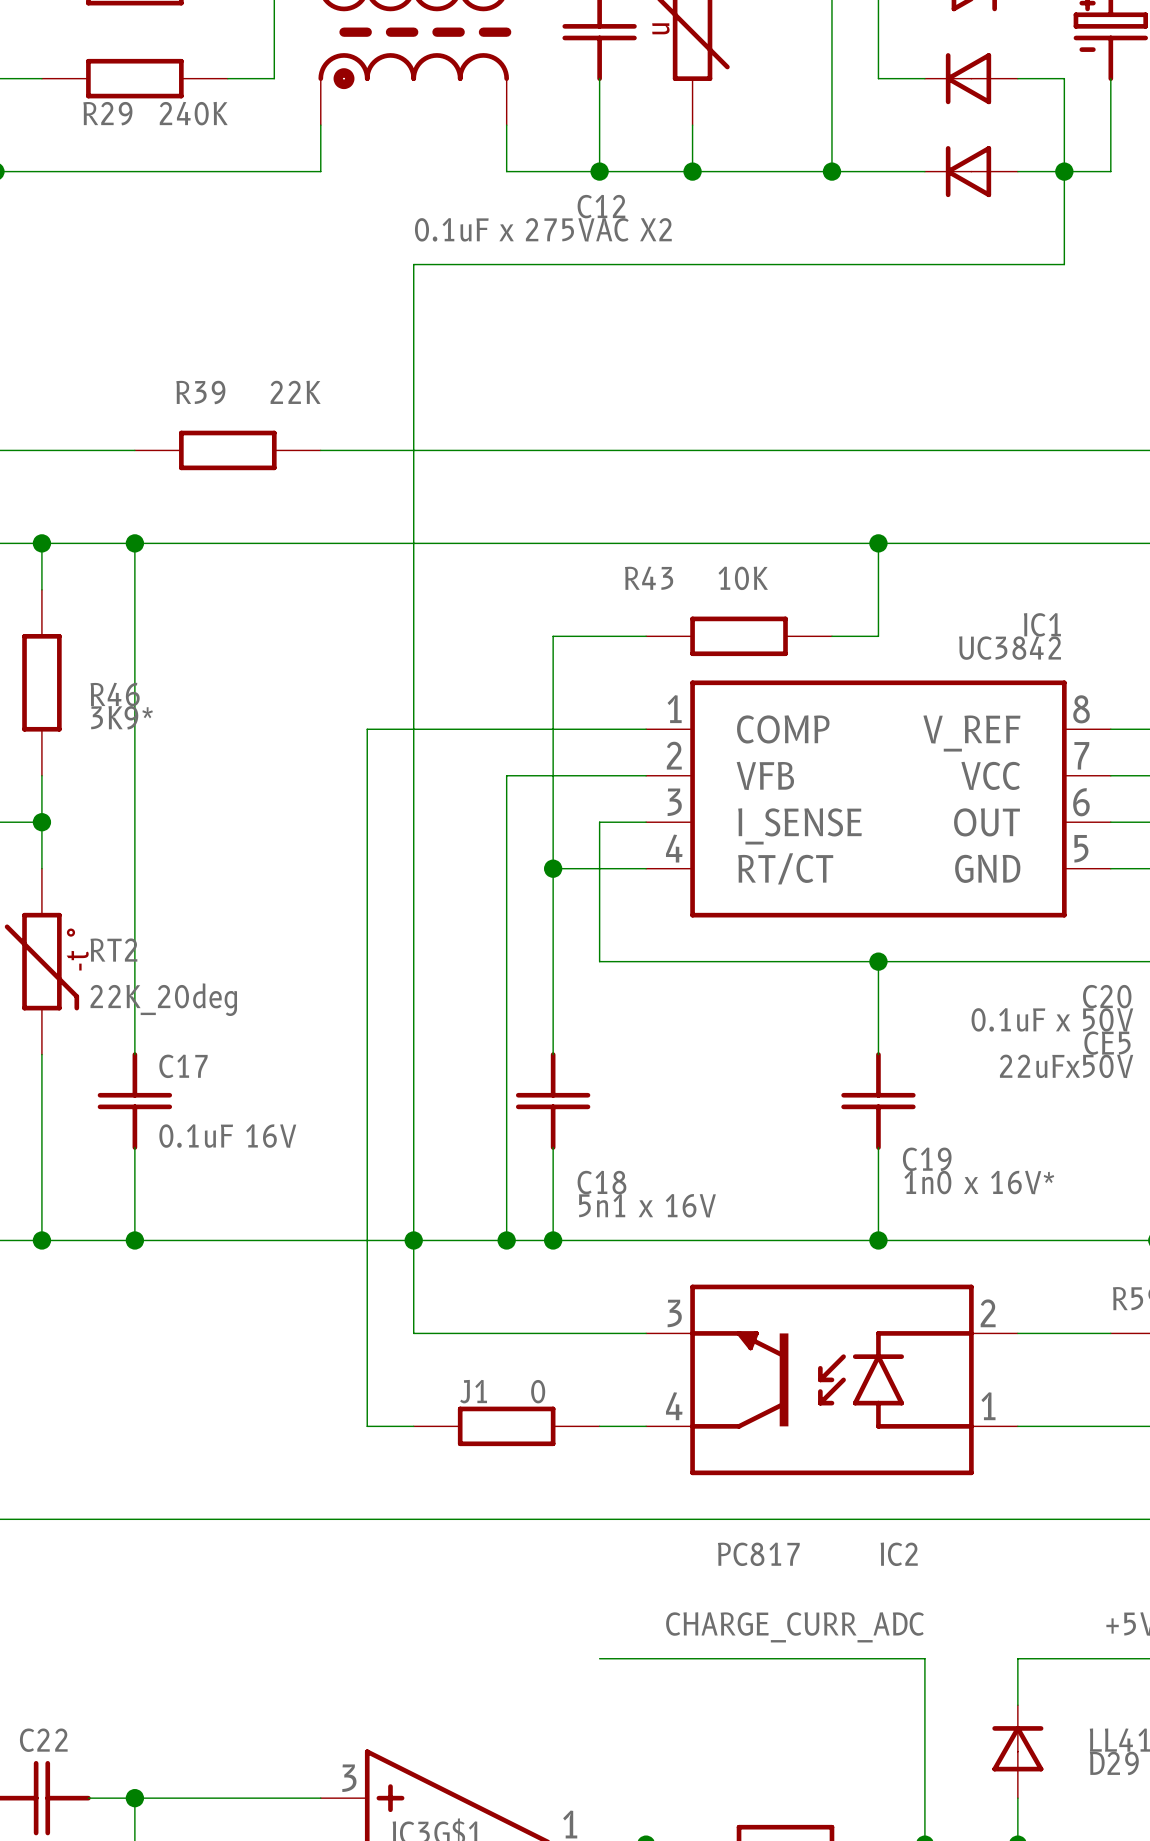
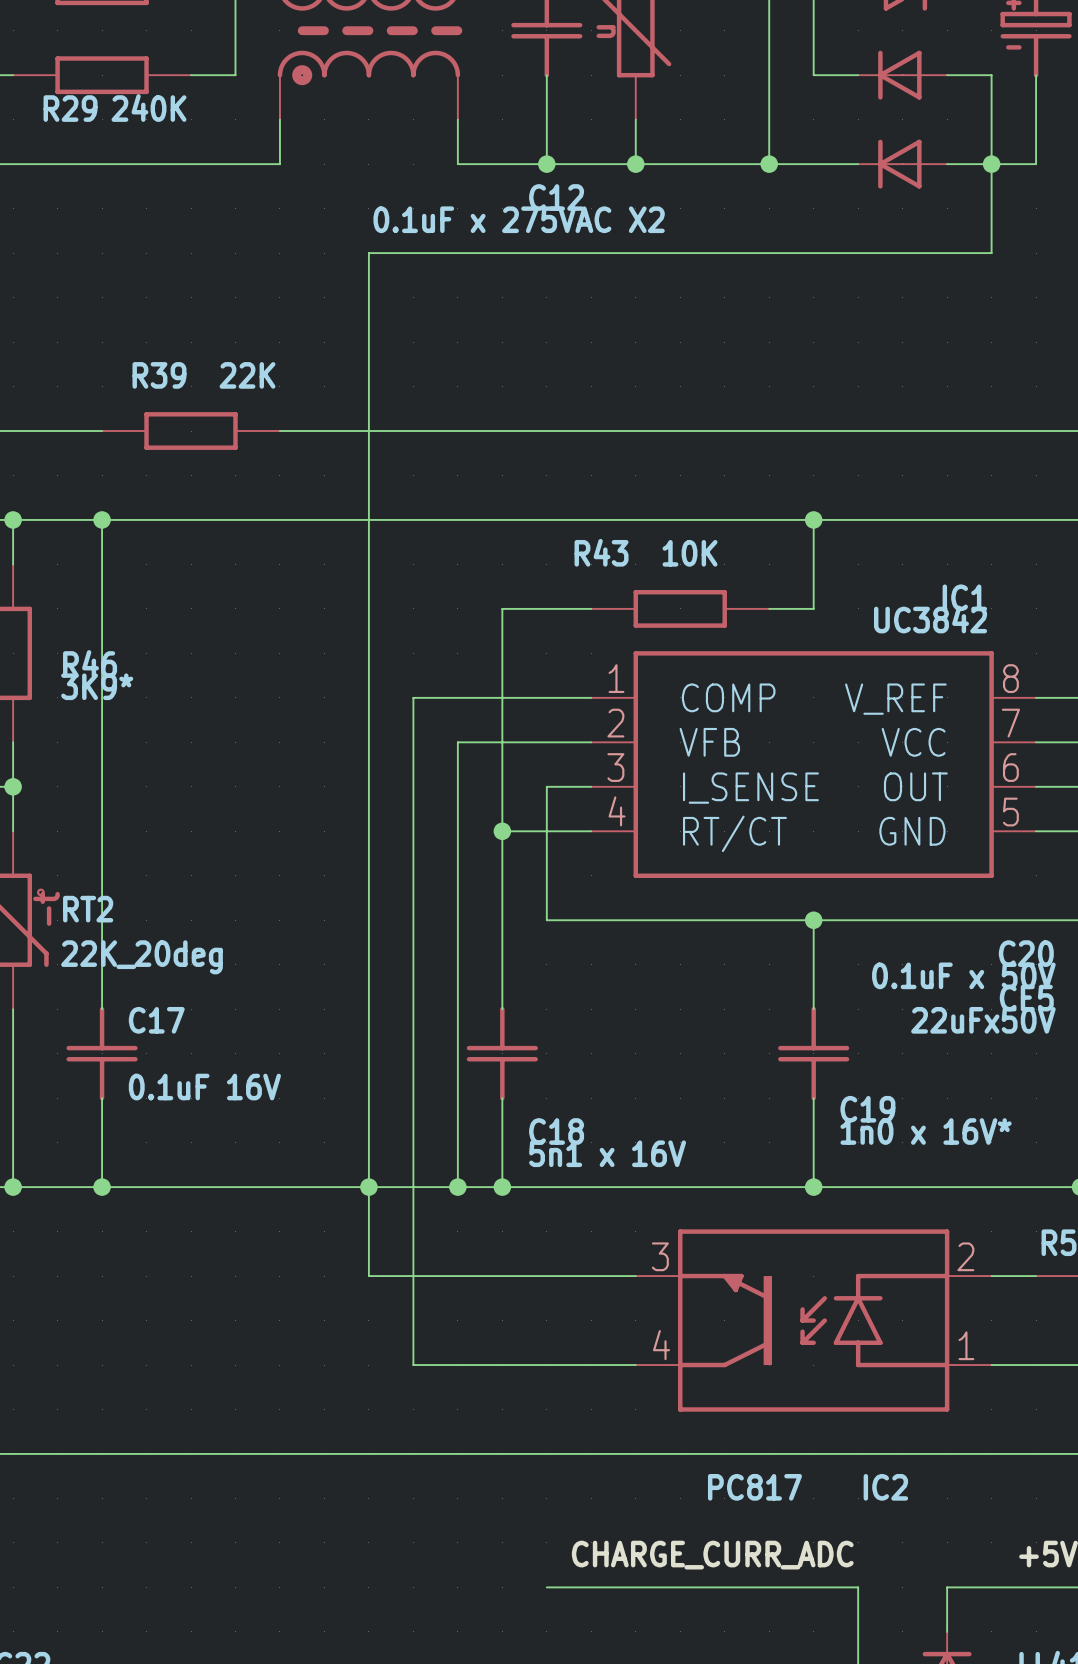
wire: (460, 729) (367, 729) (367, 1426) (413, 1426) -> (413, 697) (413, 1365) (546, 1365)
IC2 position: (831, 1379) -> (813, 1320)
J1: 0 (506, 1426) -> none

